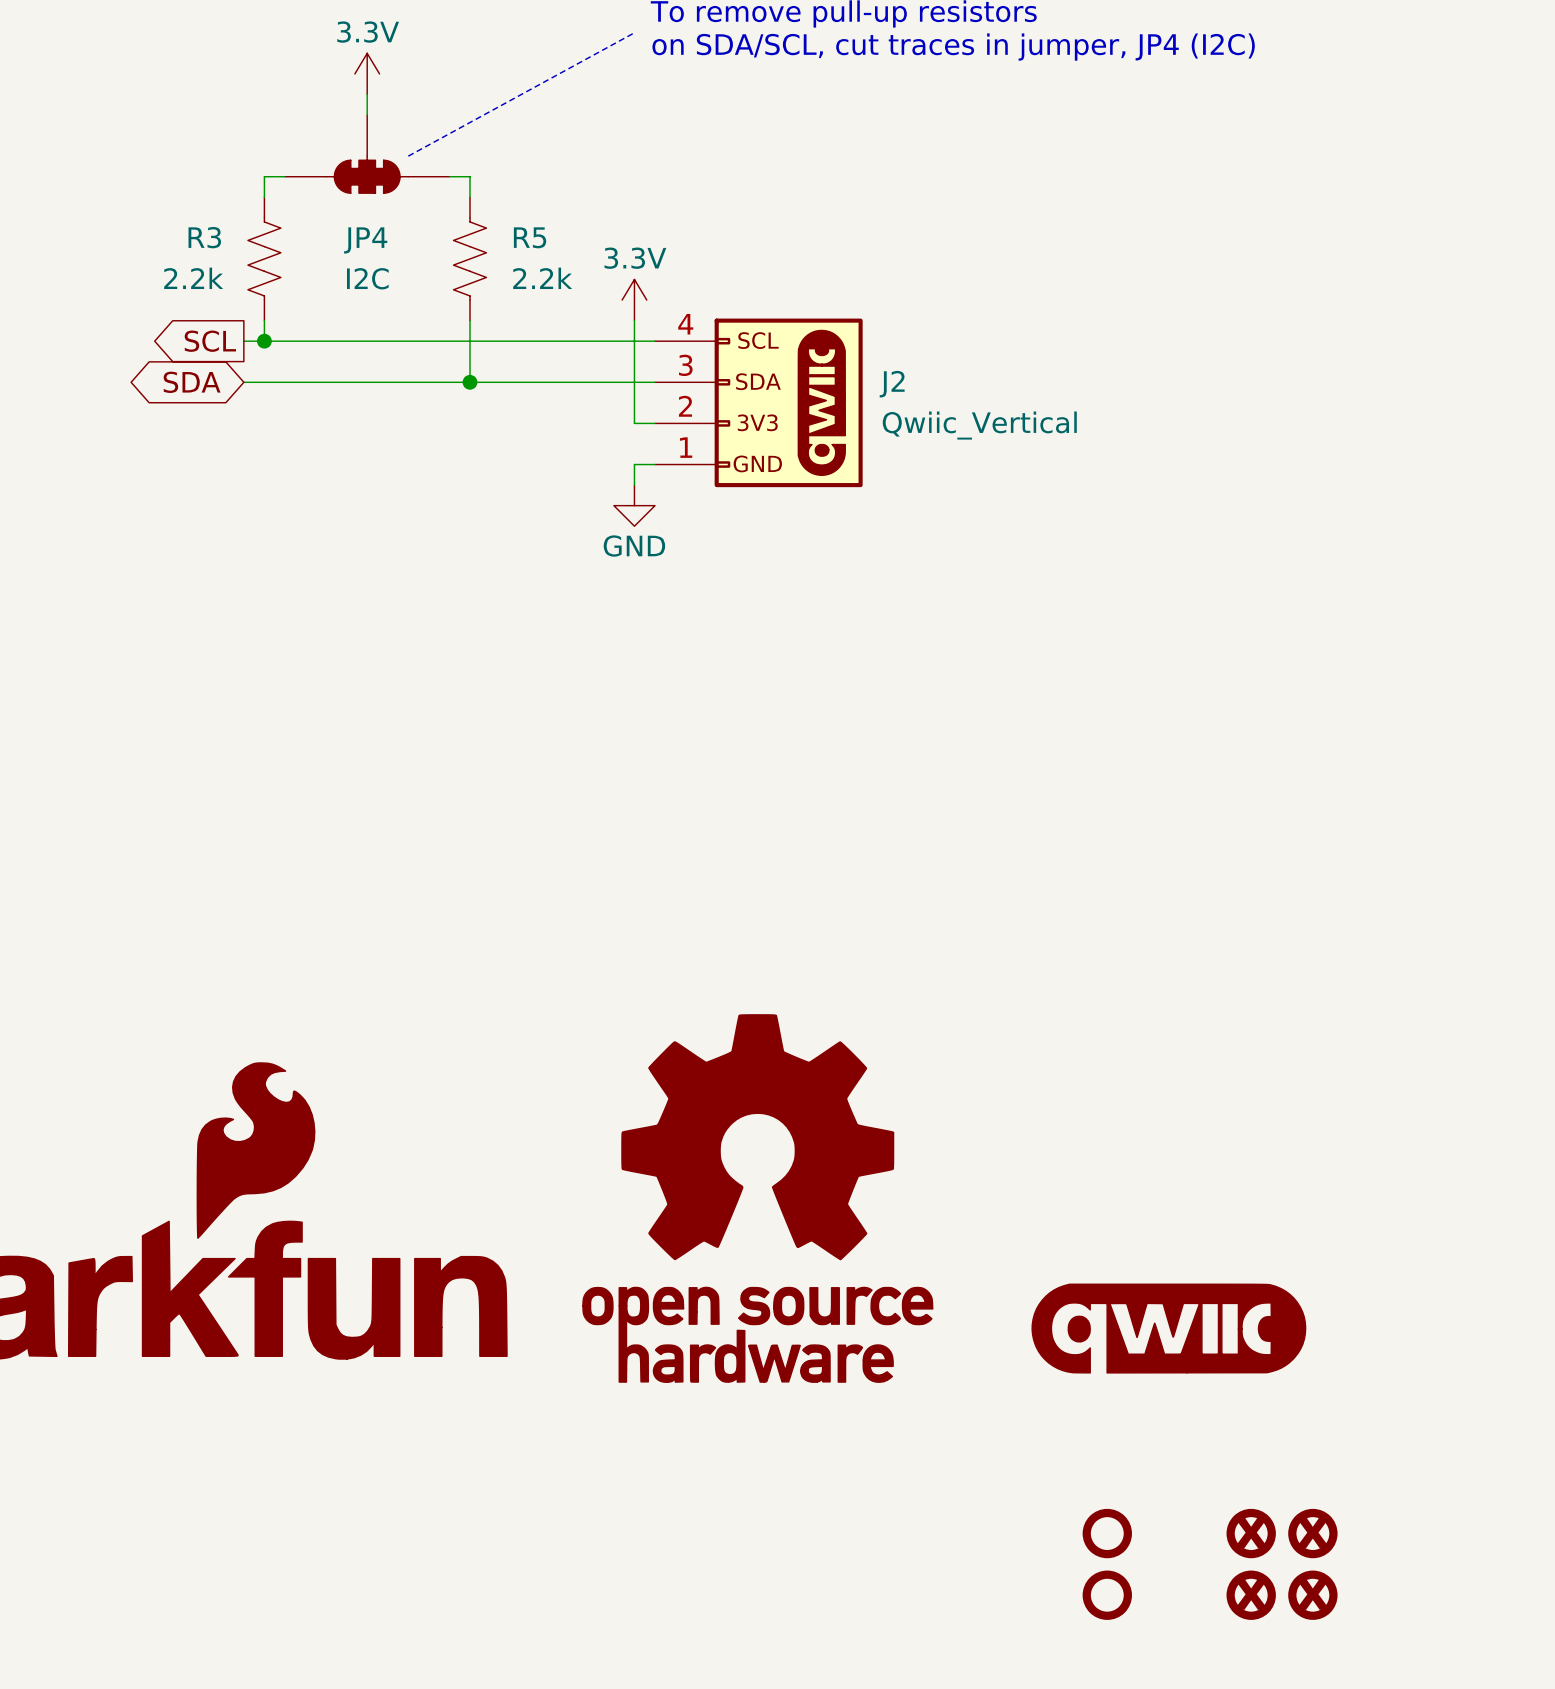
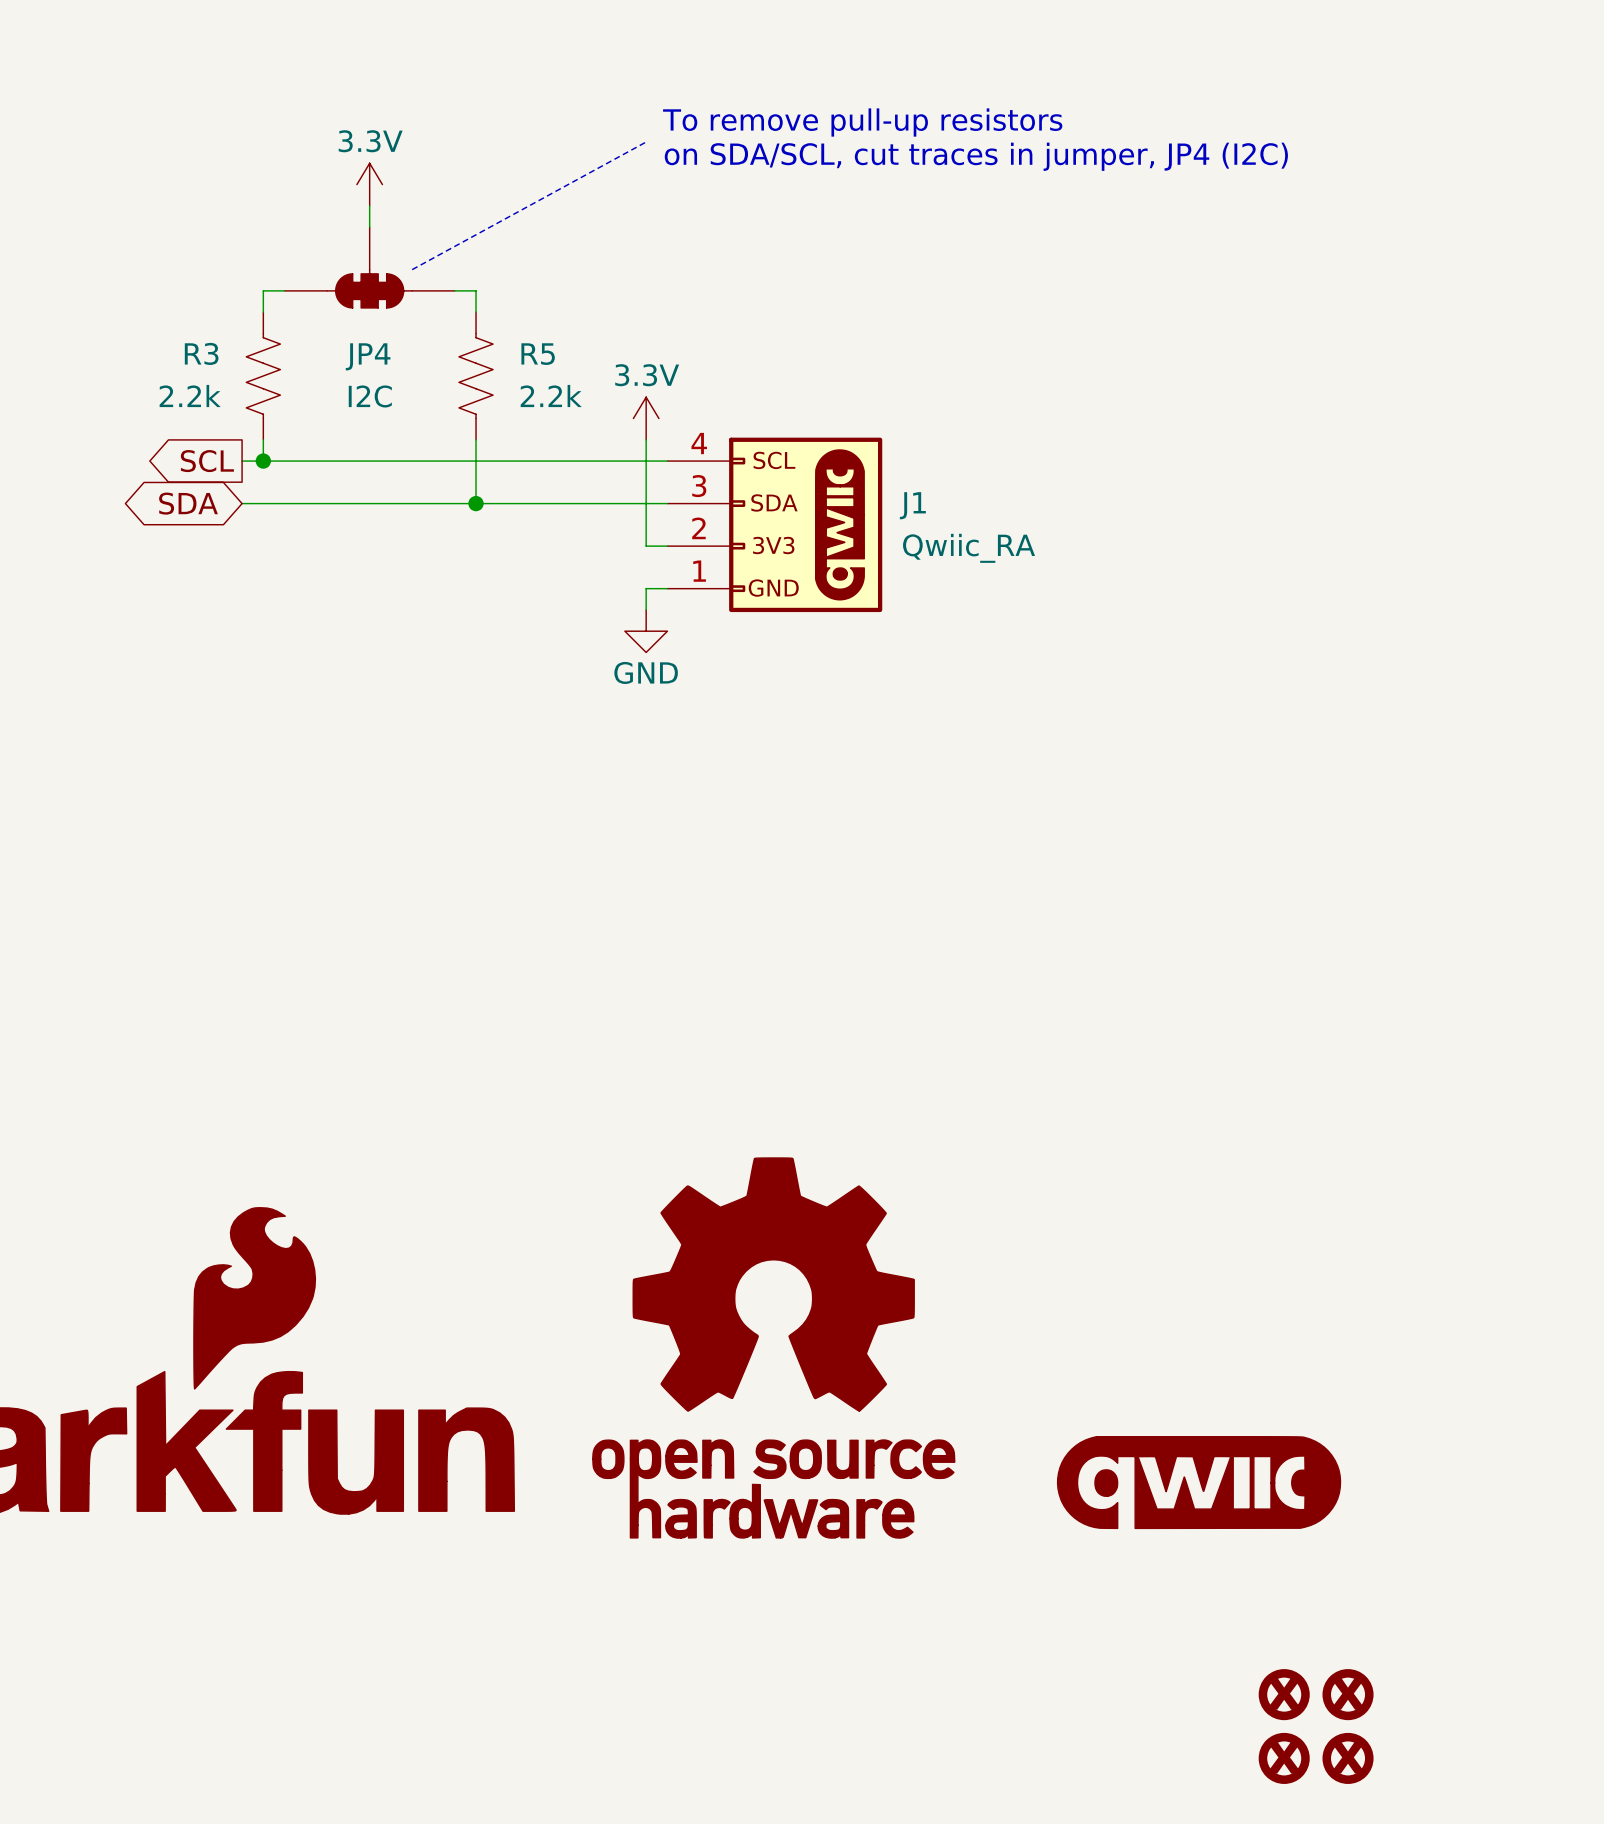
J2 name: J2 (892, 384) -> J1 (912, 505)
J2 value: Qwiic_Vertical (979, 425) -> Qwiic_RA (969, 548)
part: (1107, 1533) -> none
part: (1107, 1595) -> none

